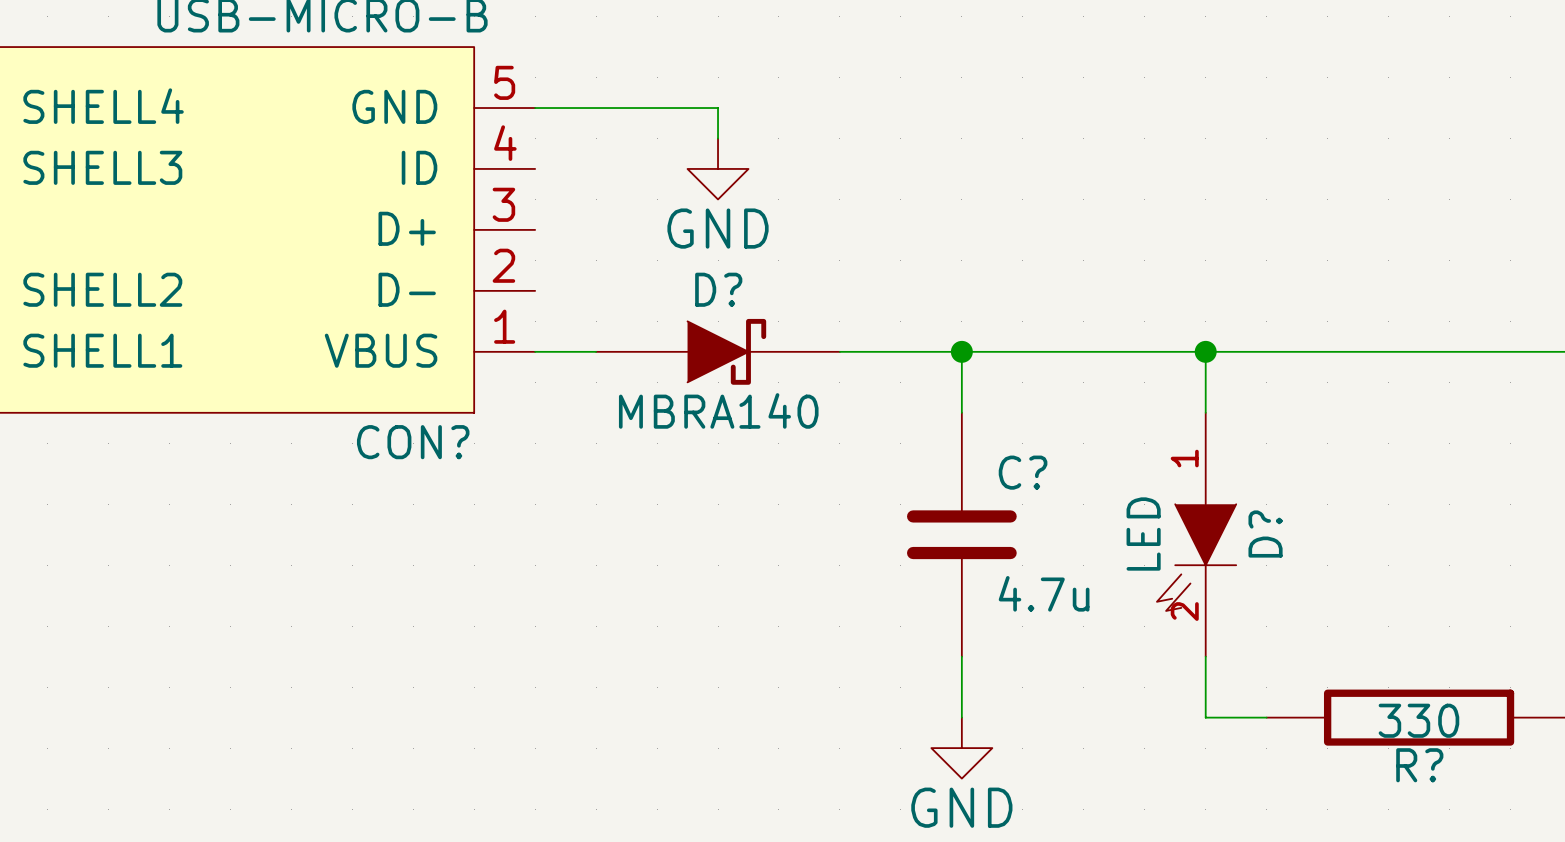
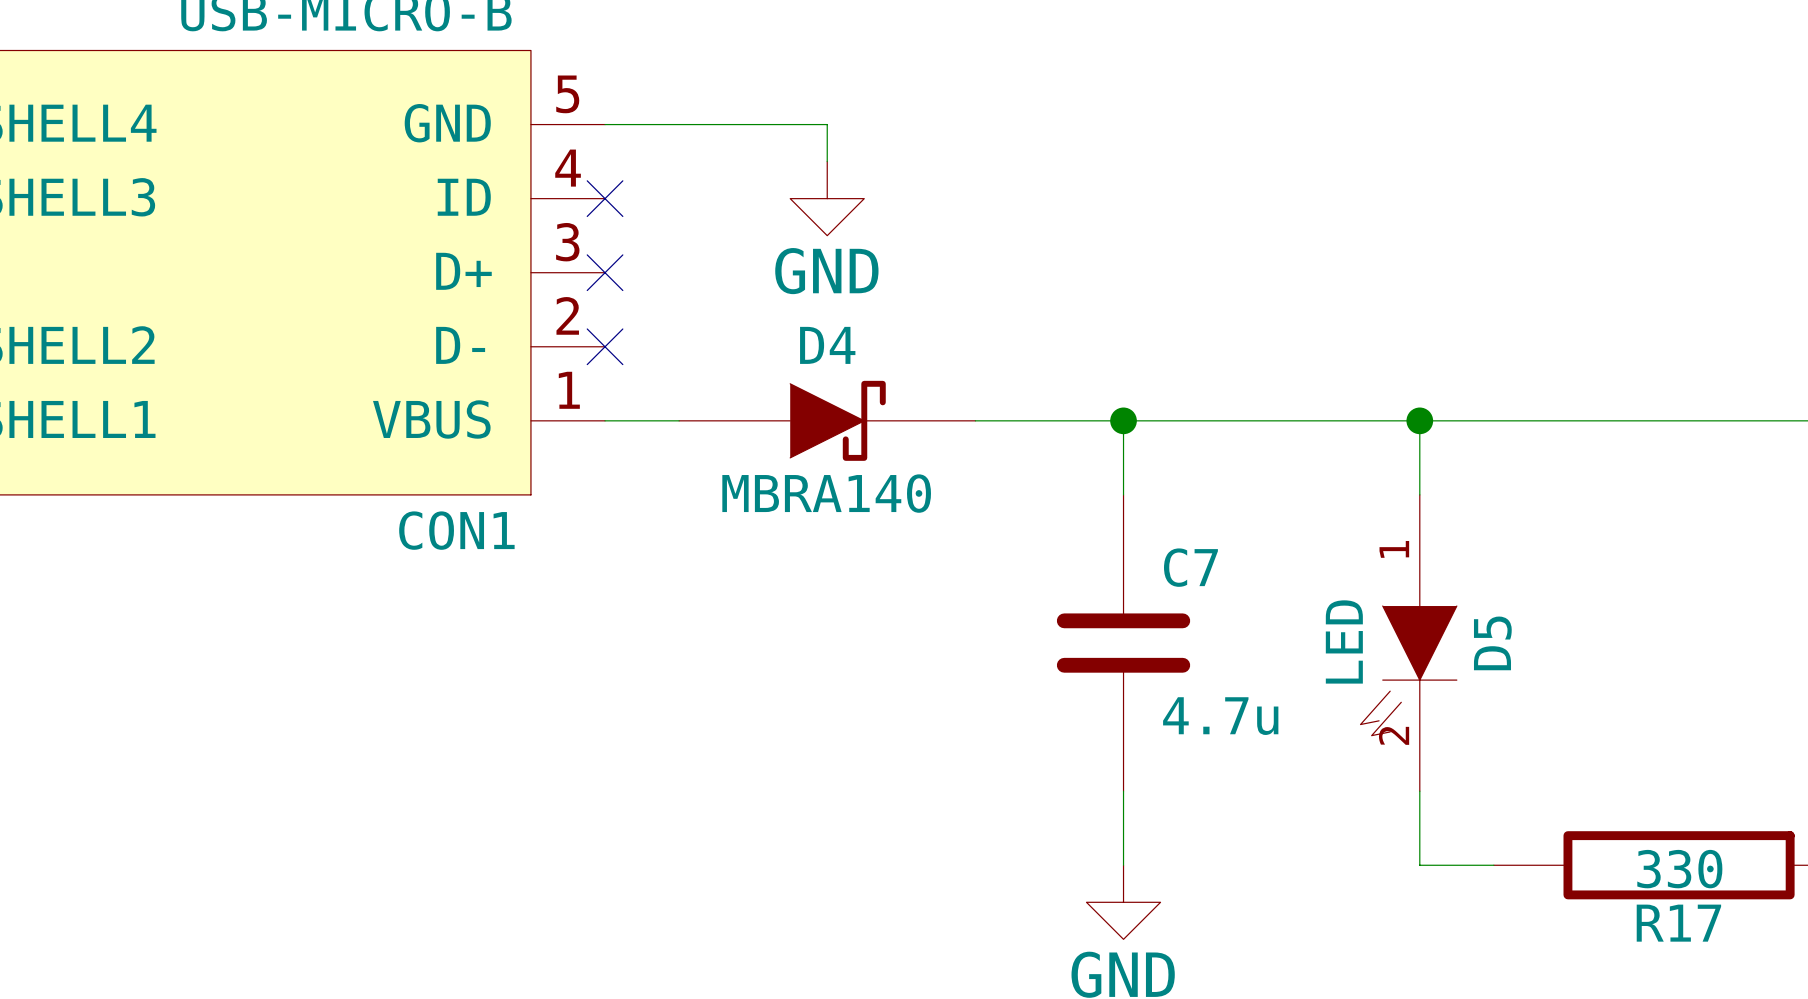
no-connect mark: none -> (605, 198)
no-connect mark: none -> (605, 272)
D? name: D? (718, 289) -> D4 (827, 345)
no-connect mark: none -> (605, 346)
CON? name: CON? (413, 442) -> CON1 (456, 530)
C? name: C? (1023, 472) -> C7 (1190, 567)
D? name: D? (1265, 534) -> D5 (1492, 643)
R? name: R? (1419, 765) -> R17 (1678, 923)

